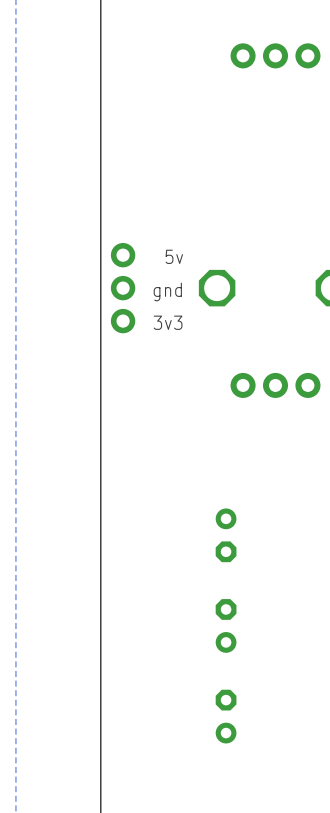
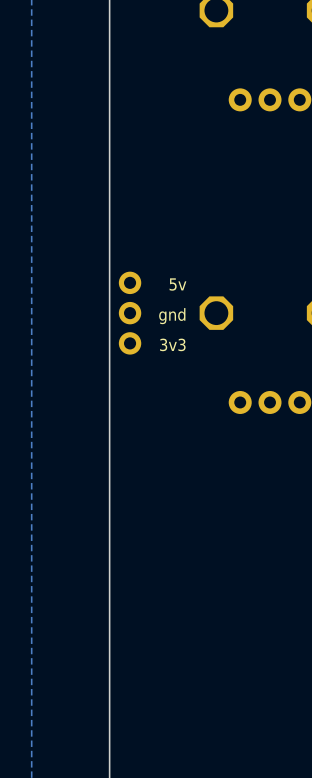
part: (226, 535) -> none
part: (226, 625) -> none
part: (226, 716) -> none

